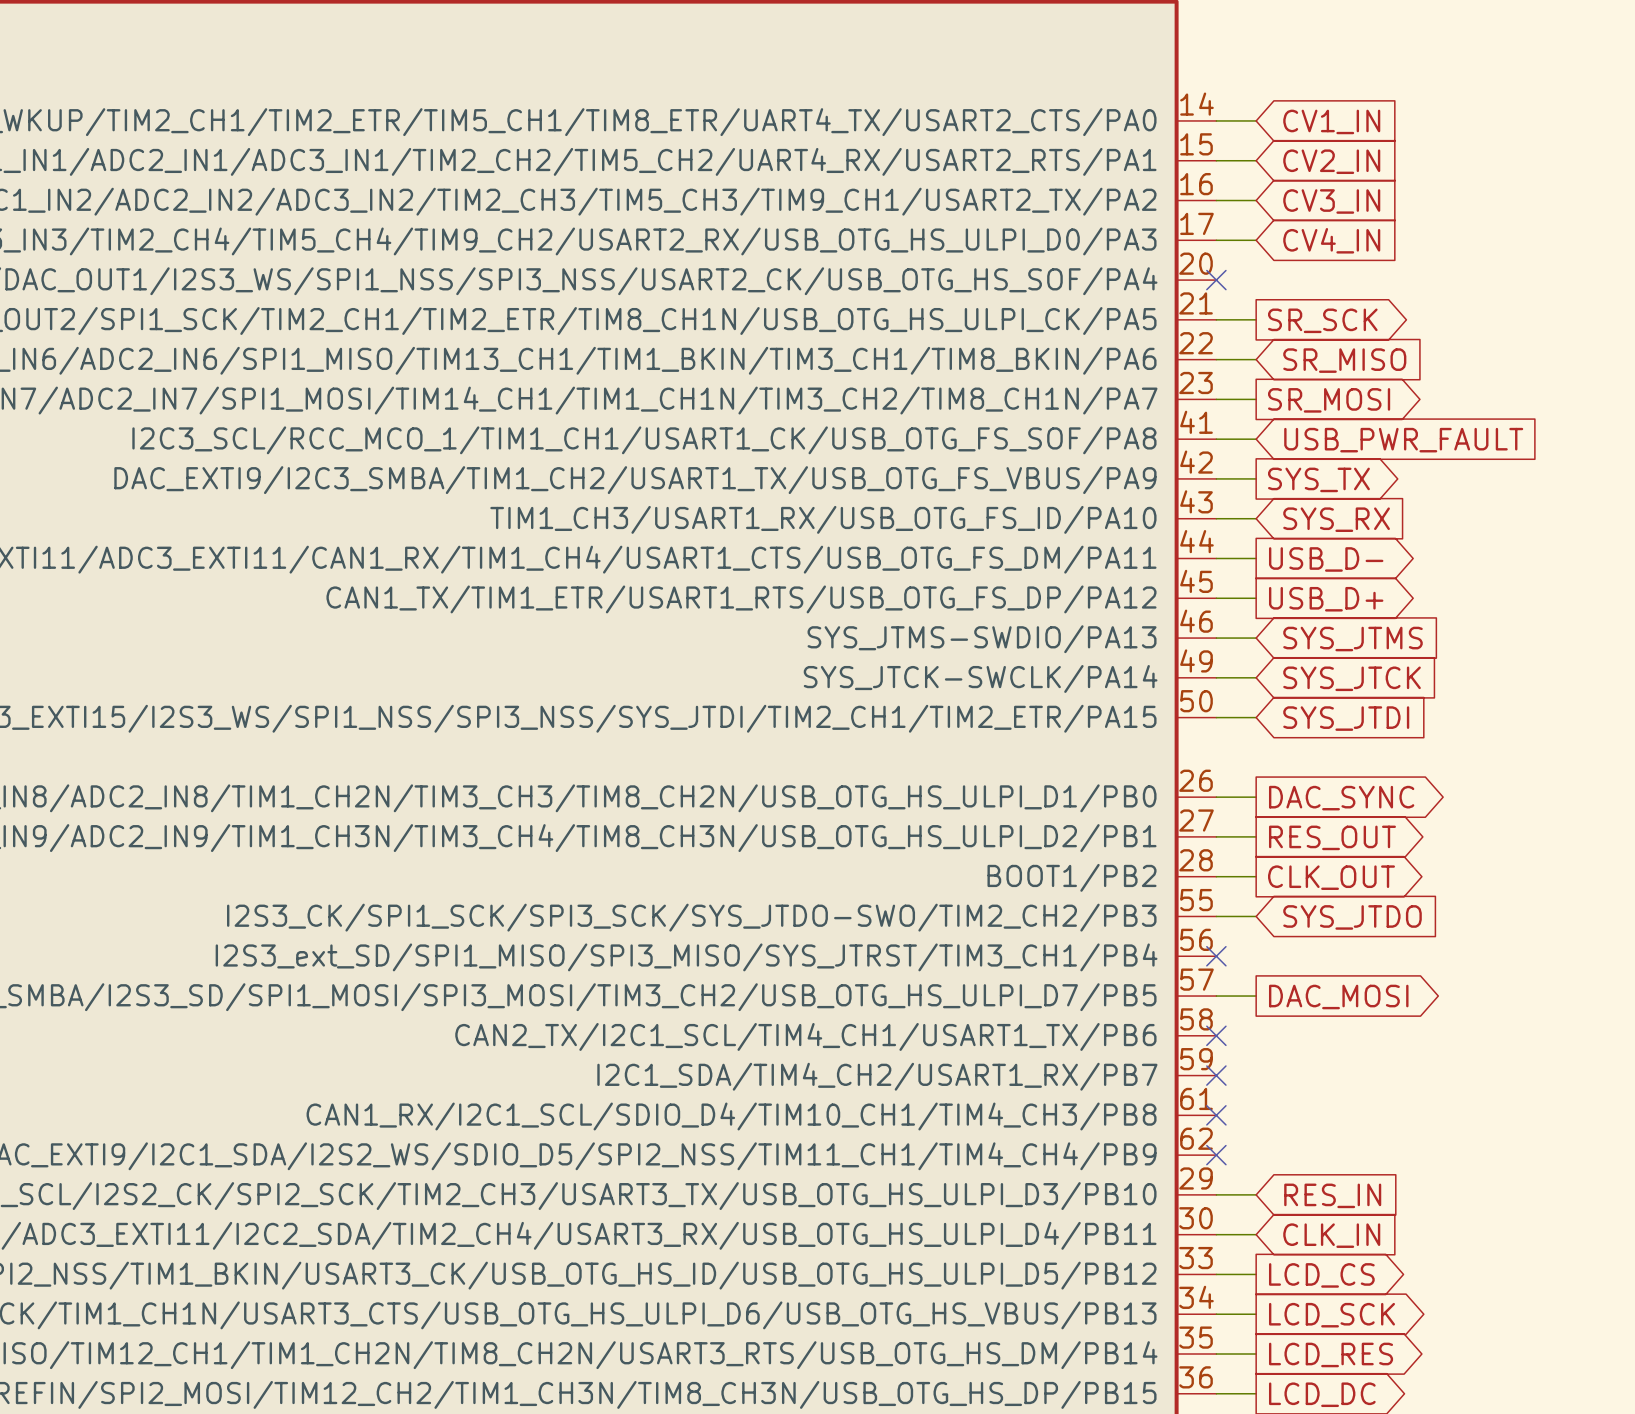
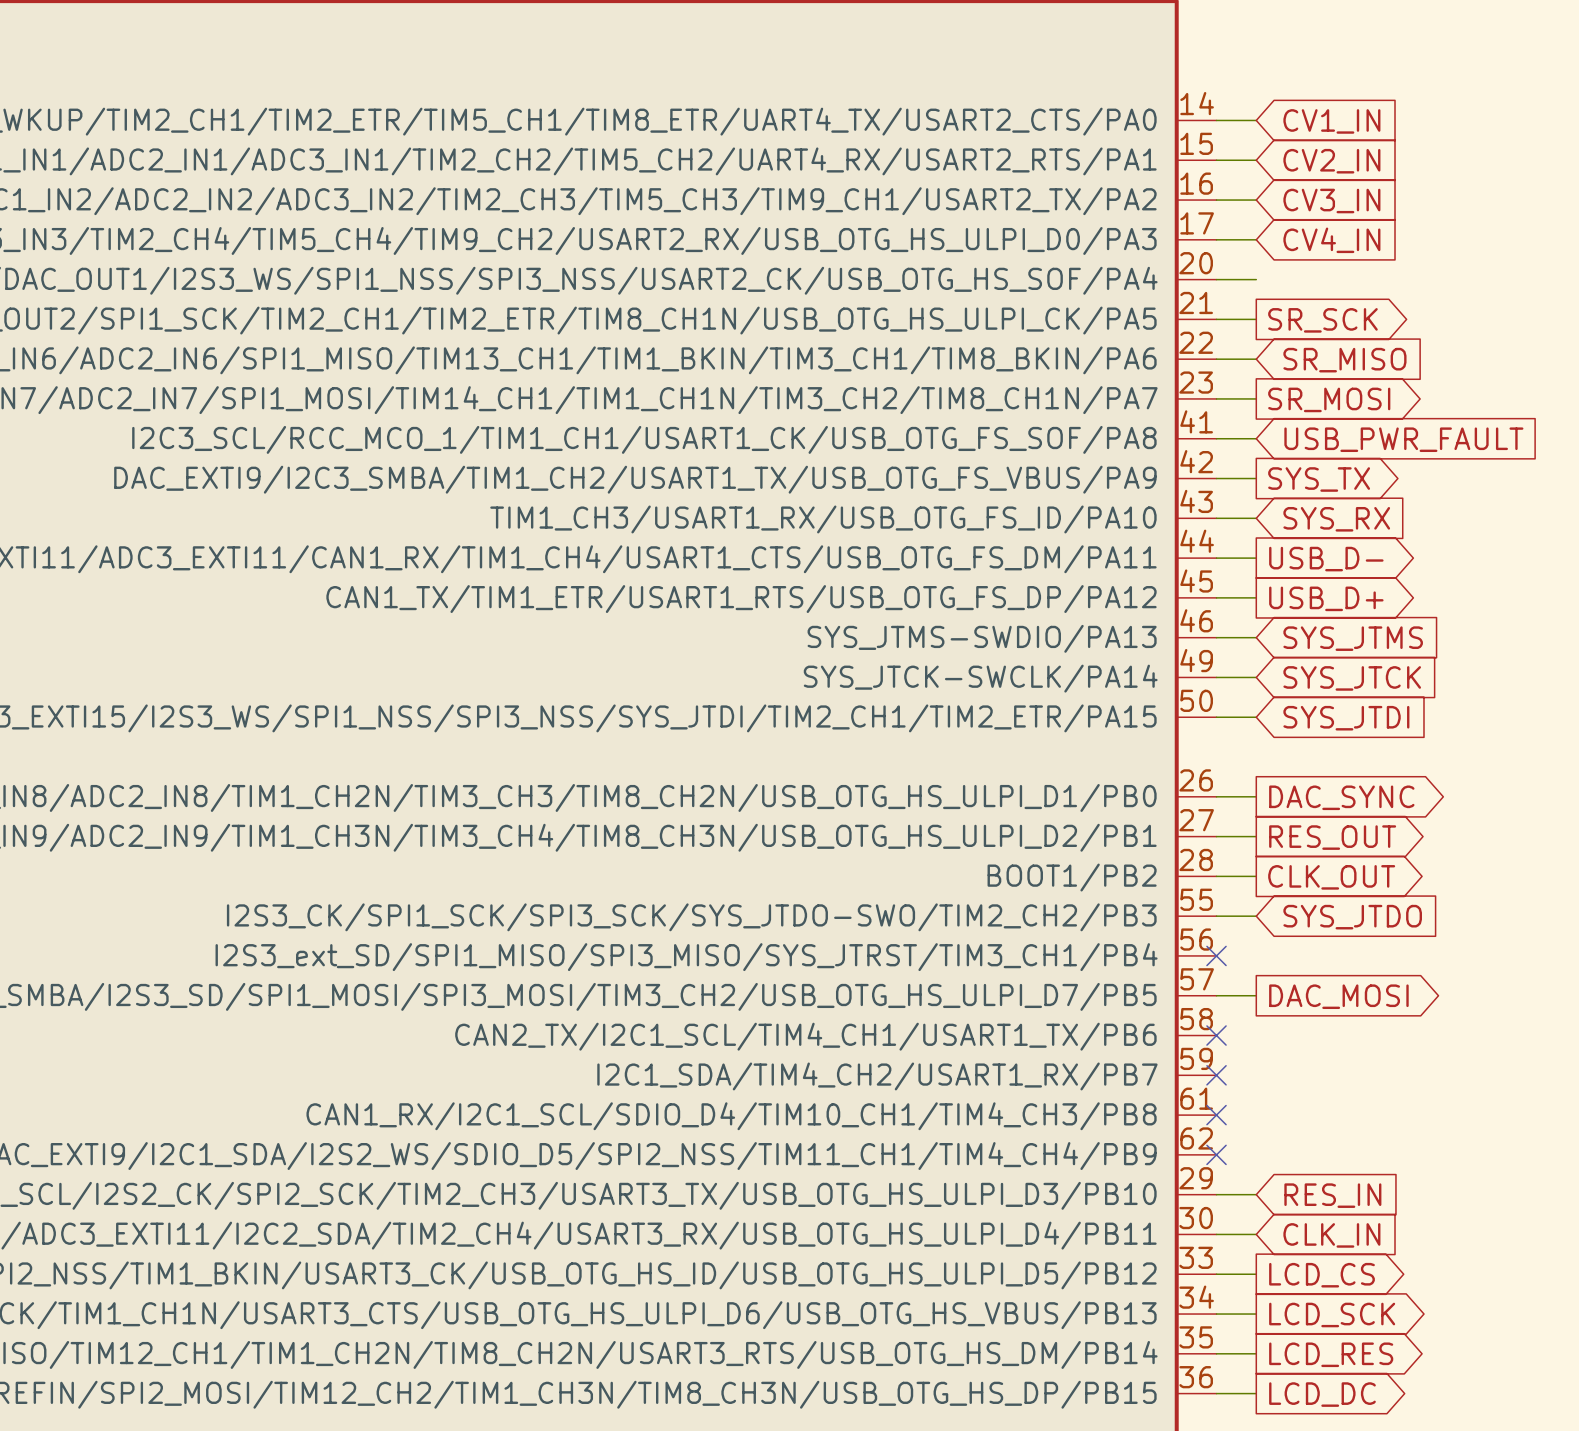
wire: none -> (1216, 279) (1256, 279)
no-connect mark: (1216, 280) -> none

